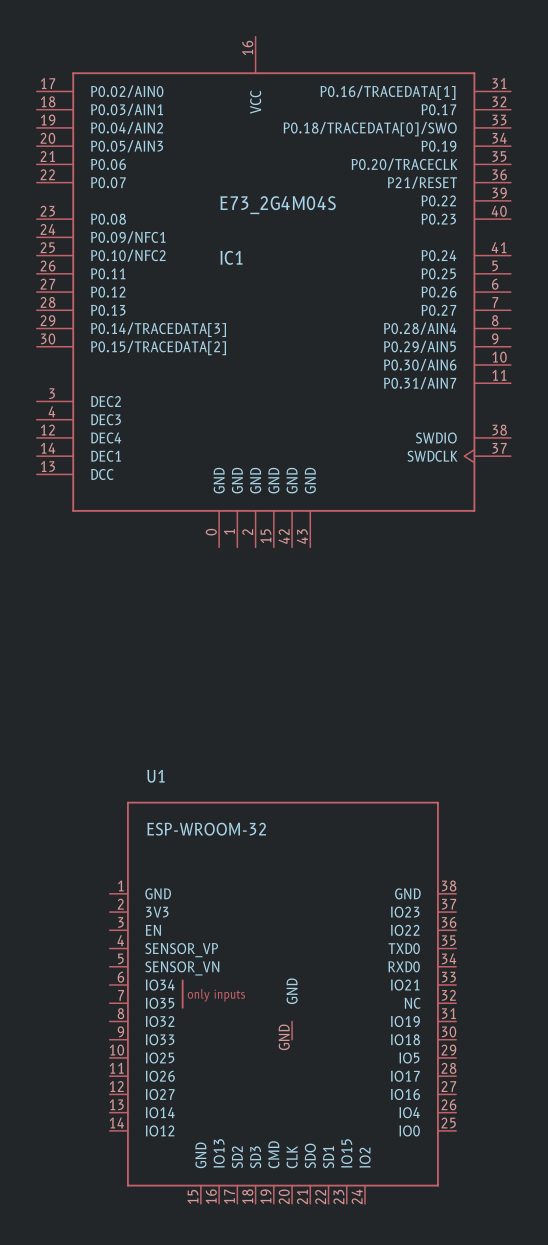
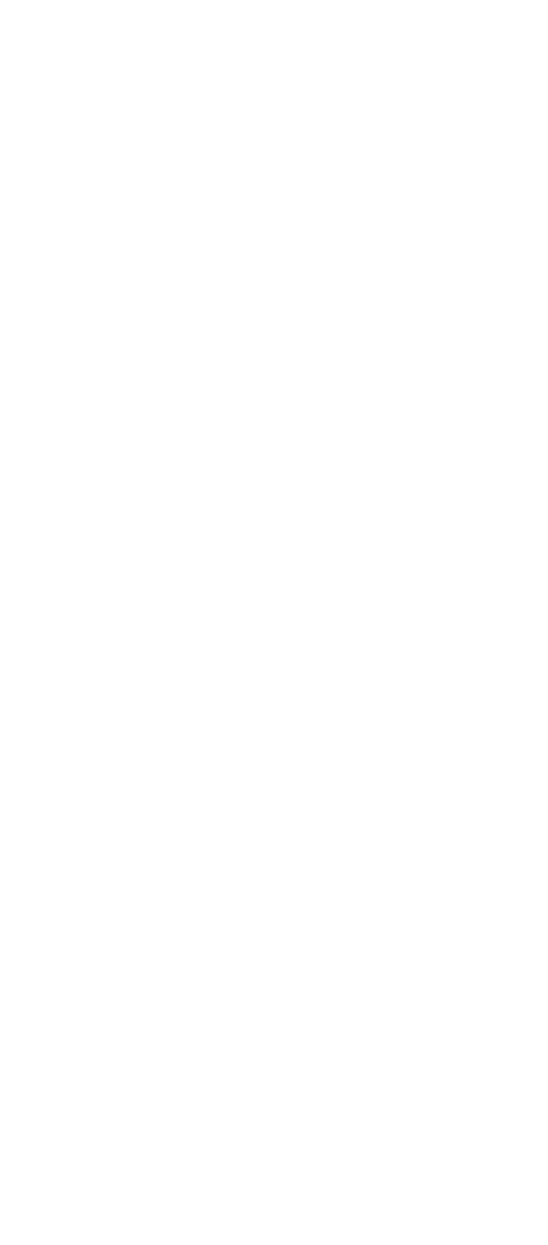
IC1: E73_2G4M04S (273, 292) -> none
U1: ESP-WROOM-32 (282, 1002) -> none

